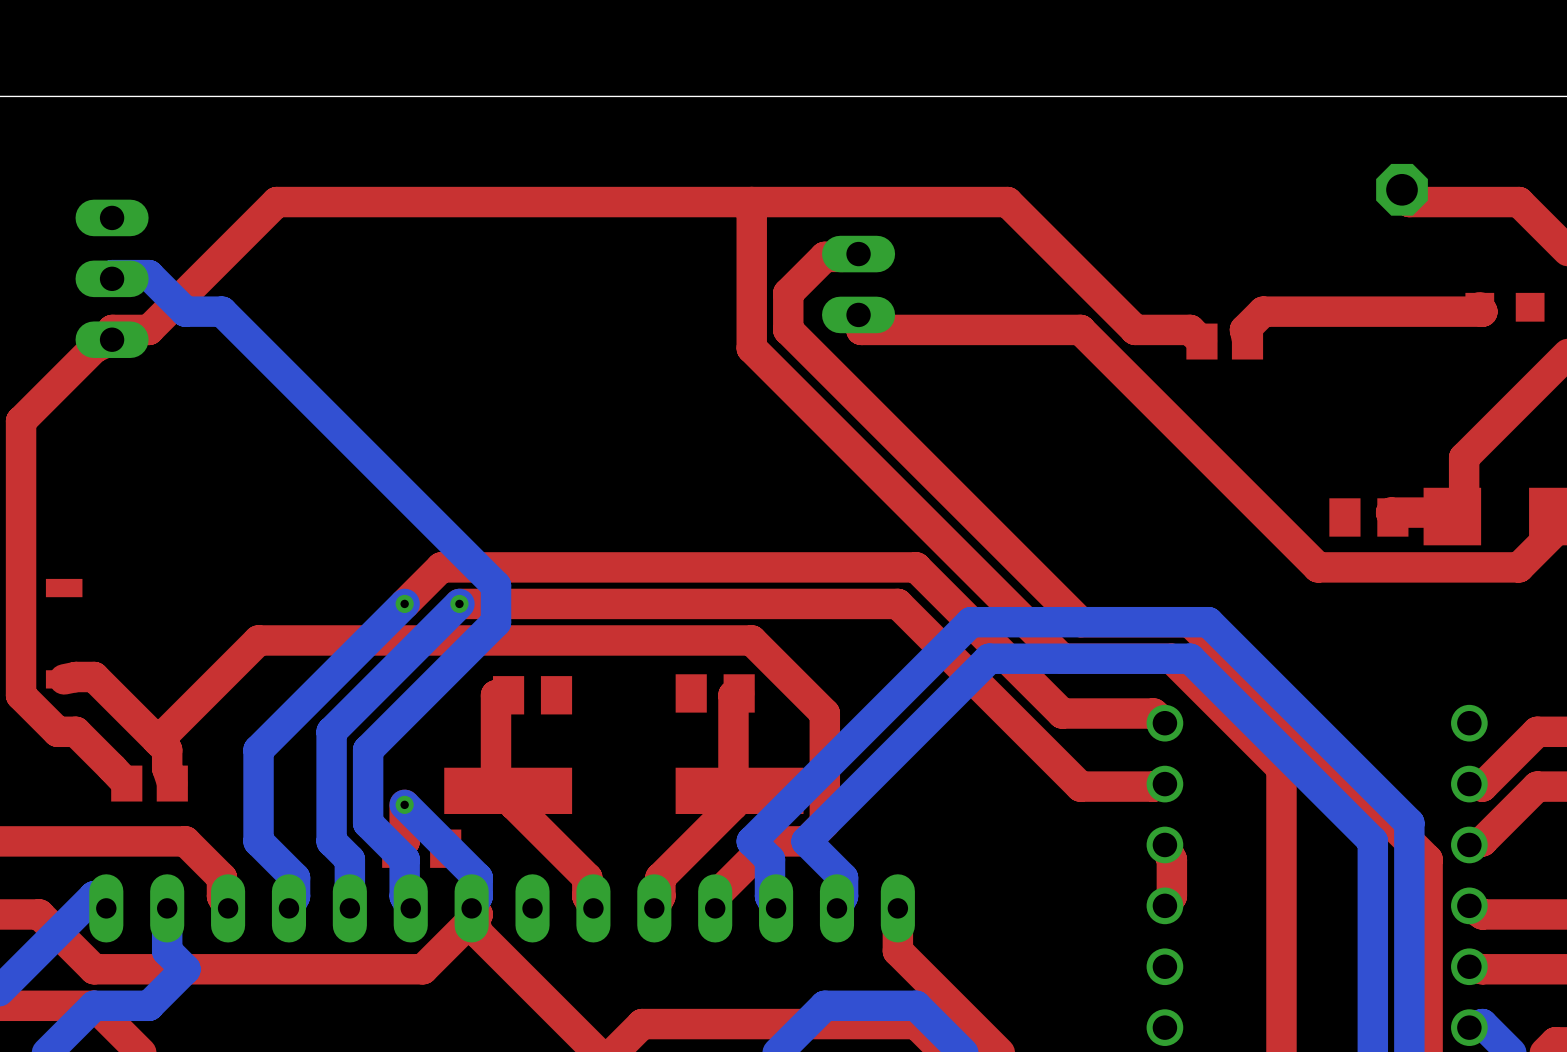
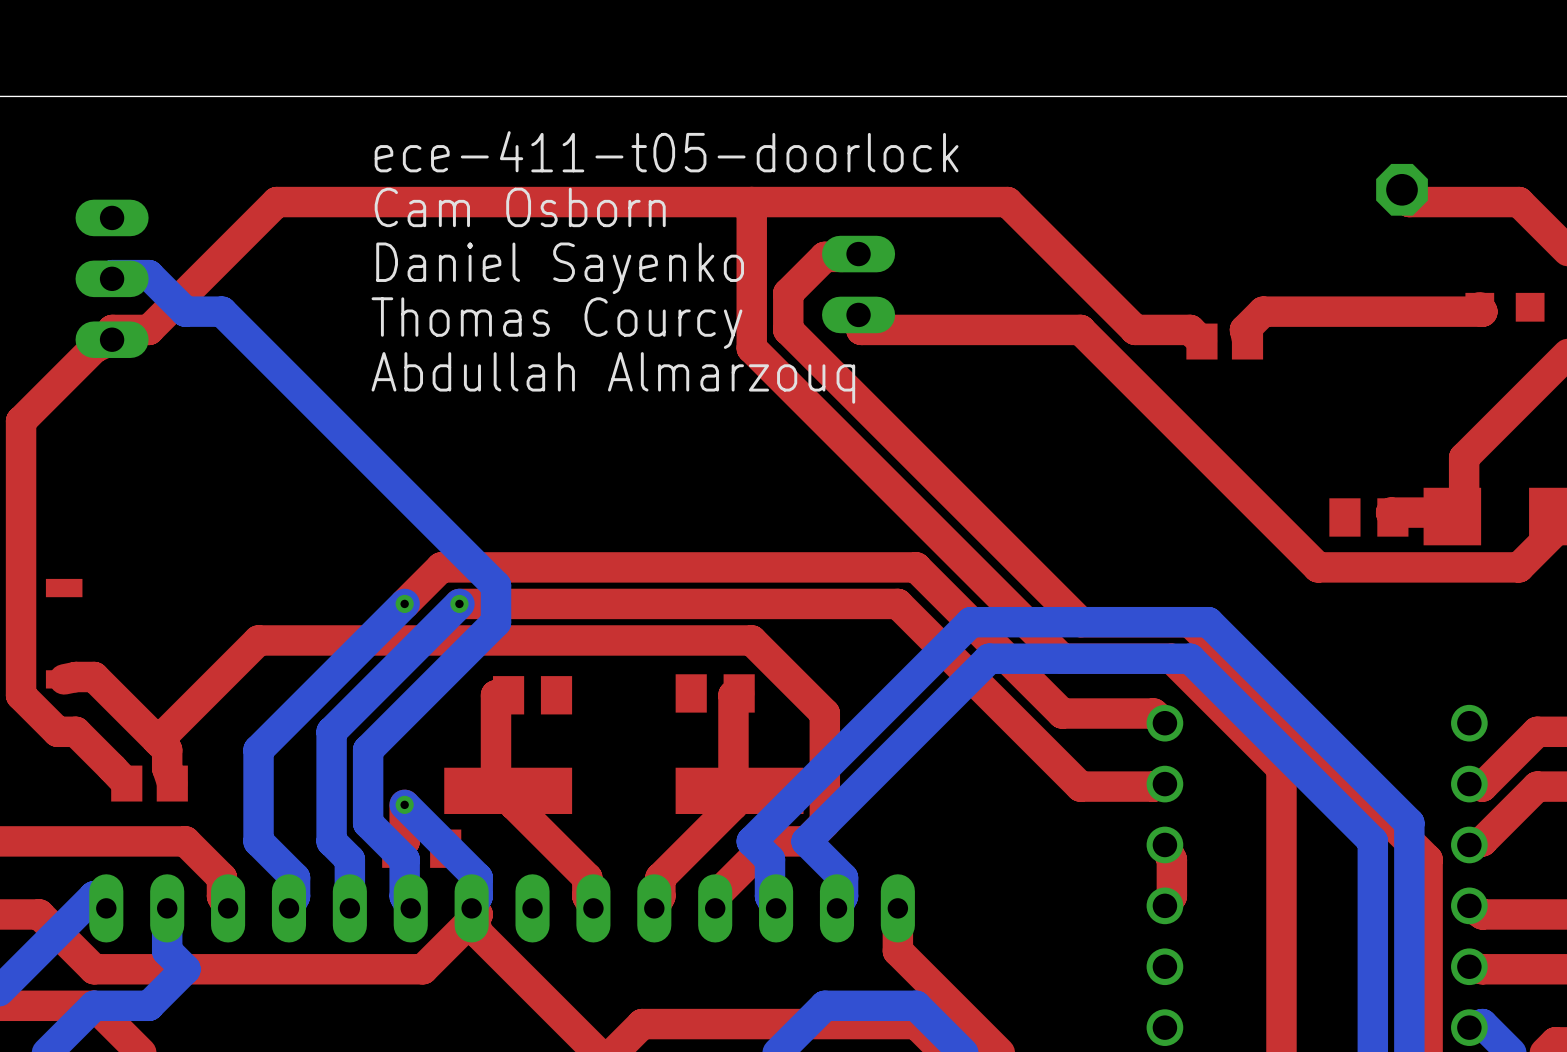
text: none -> ece-411-t05-doorlock (666, 151)
text: none -> Cam Osborn (520, 207)
text: none -> Daniel Sayenko (560, 268)
text: none -> Thomas Courcy (556, 323)
text: none -> Abdullah Almarzouq (613, 377)

